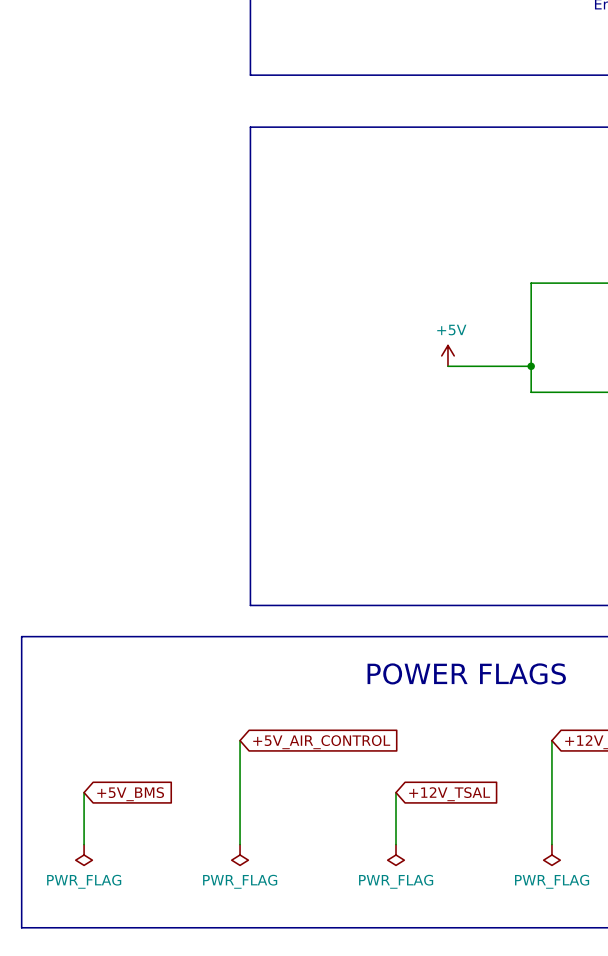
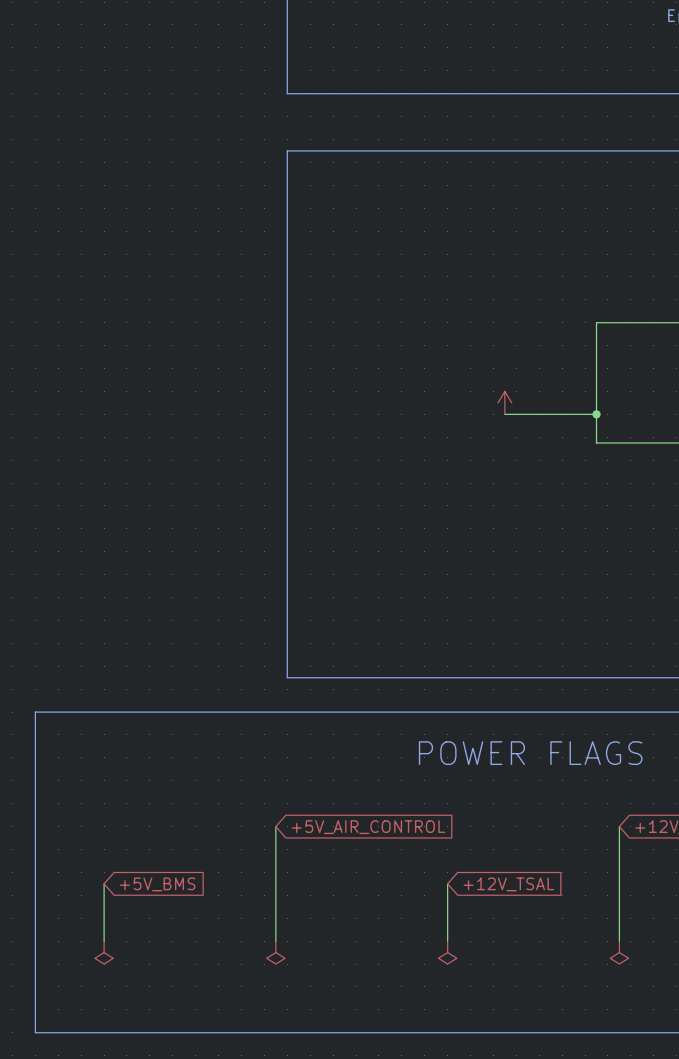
power symbol text: +5V (451, 330) -> none
power symbol text: PWR_FLAG (84, 881) -> none
power symbol text: PWR_FLAG (240, 881) -> none
power symbol text: PWR_FLAG (396, 881) -> none
power symbol text: PWR_FLAG (552, 881) -> none

